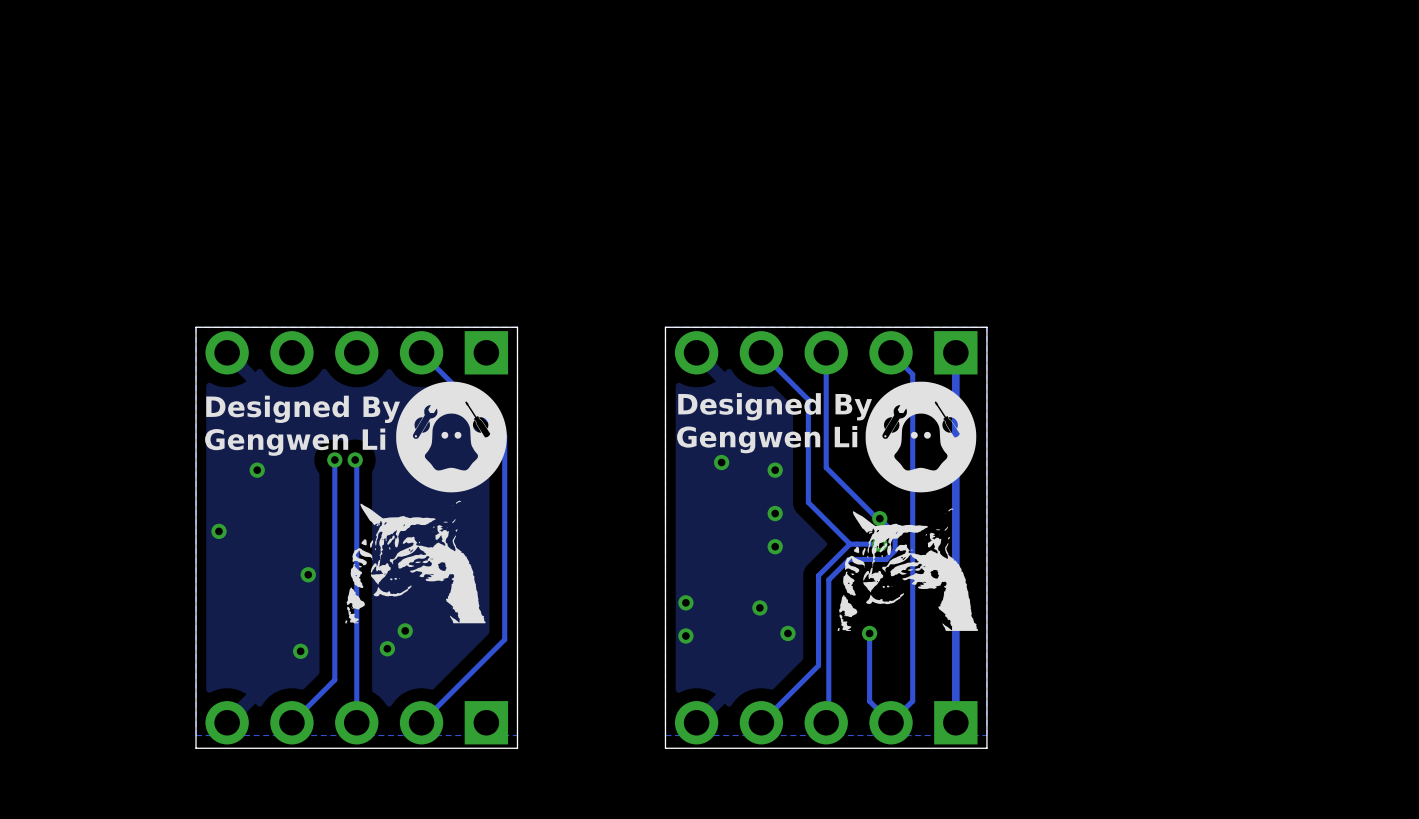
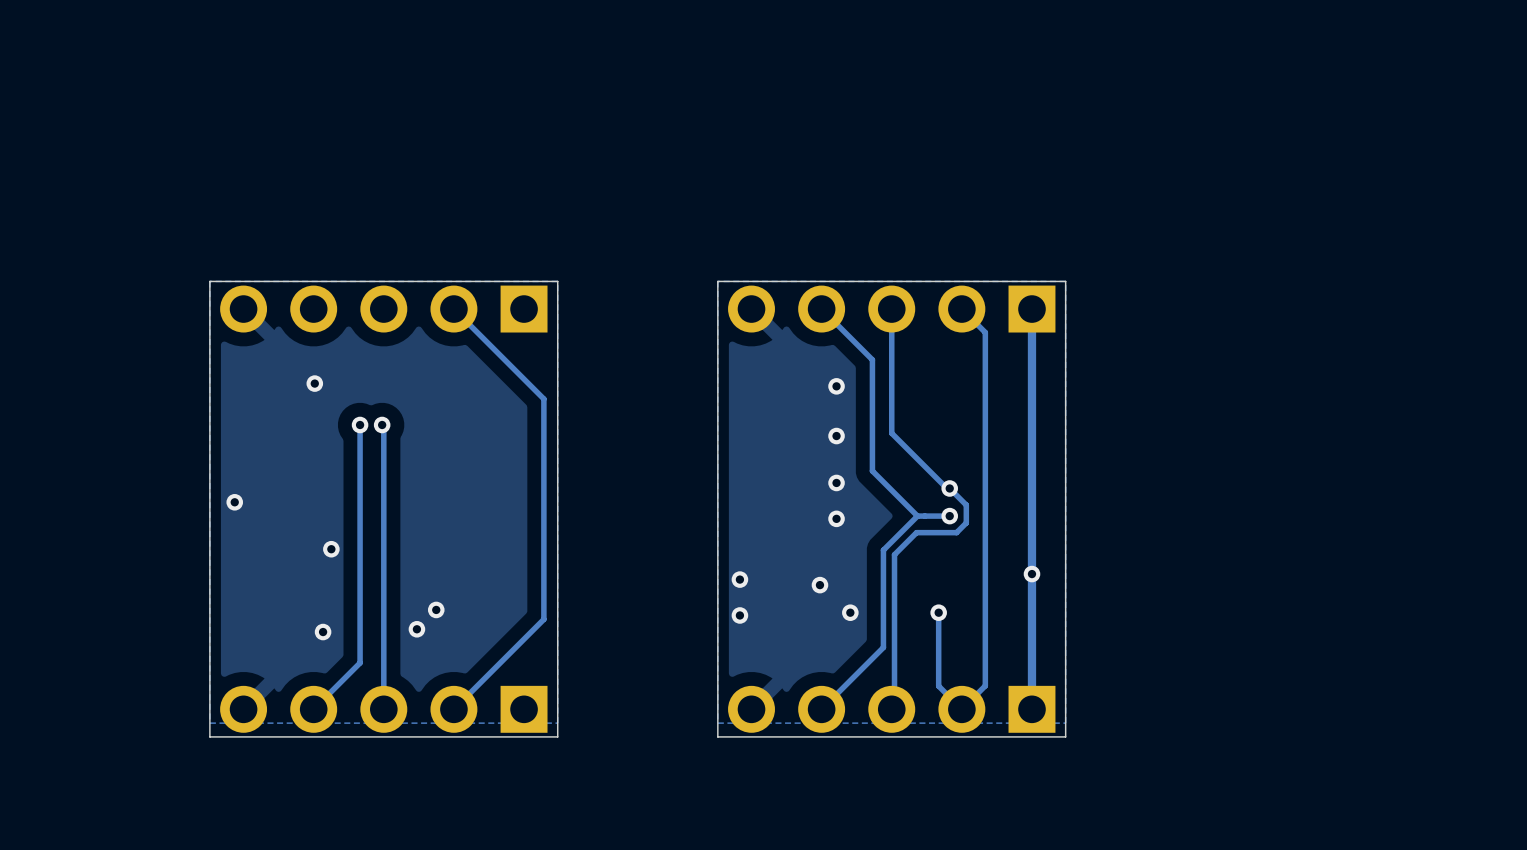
drawing: [345, 381, 507, 624] -> none
drawing: [837, 381, 979, 631] -> none
text: Designed By (775, 406) -> none
text: Designed By (303, 409) -> none
text: Gengwen Li (767, 439) -> none
text: Gengwen Li (295, 442) -> none
via position: (721, 462) -> (836, 386)
via position: (257, 470) -> (314, 383)

